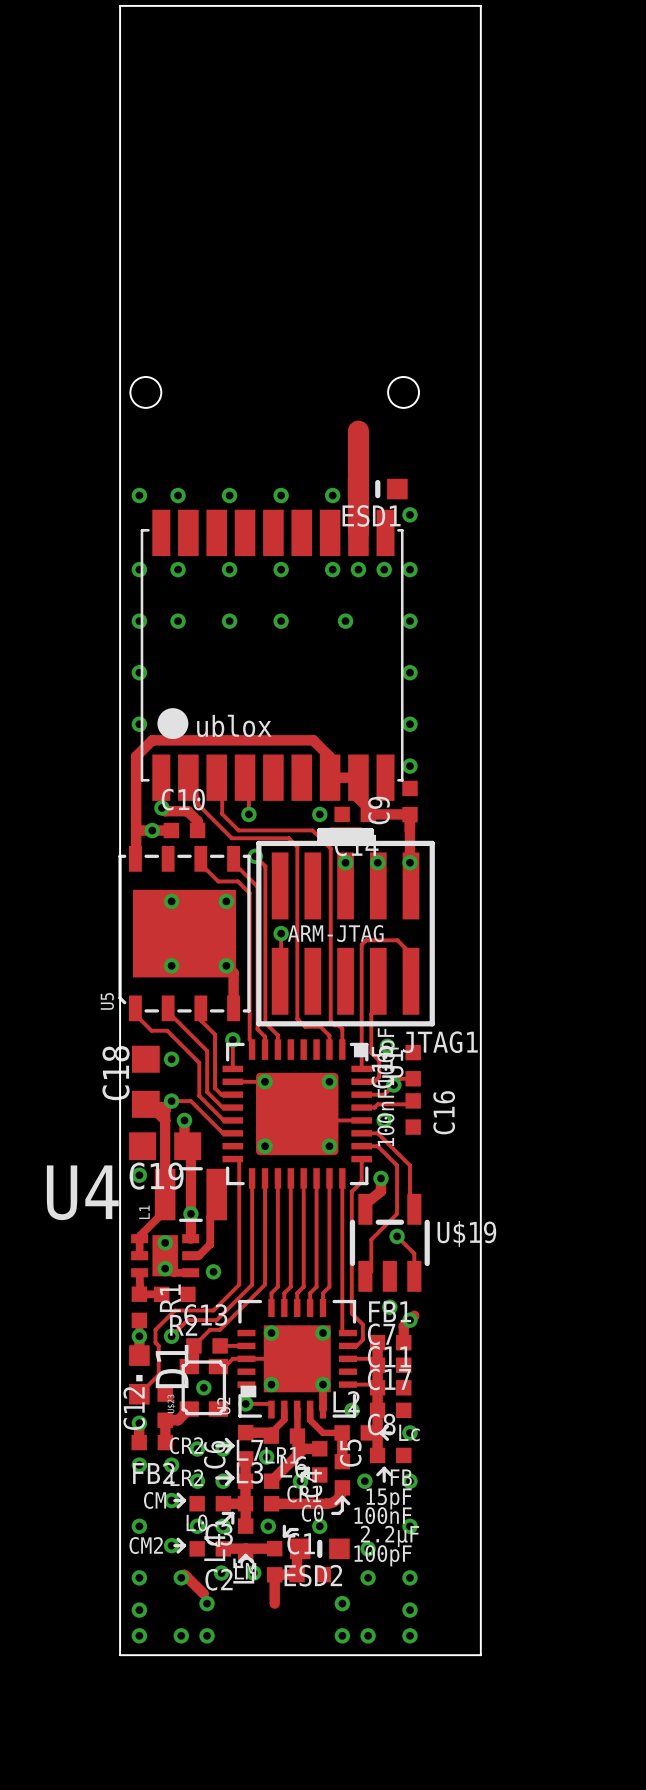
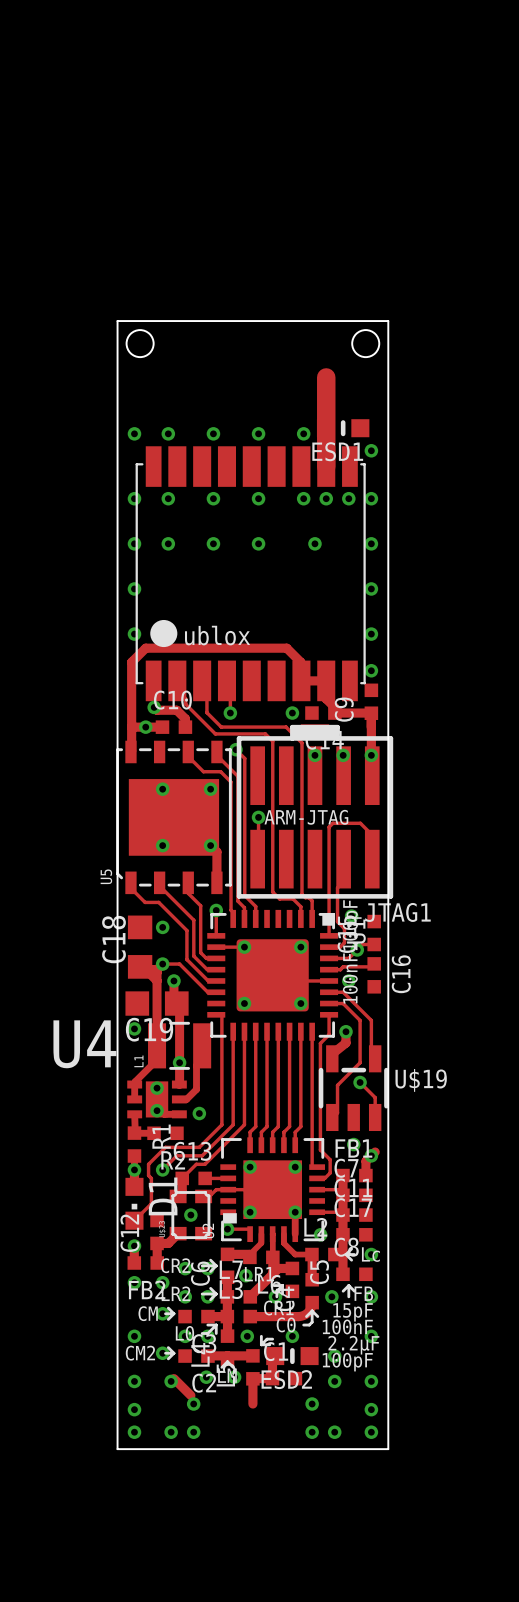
board edge: (120, 366) (120, 5) (480, 5) (480, 1655) (429, 1655) -> (117, 321) (388, 321) (388, 1449)

